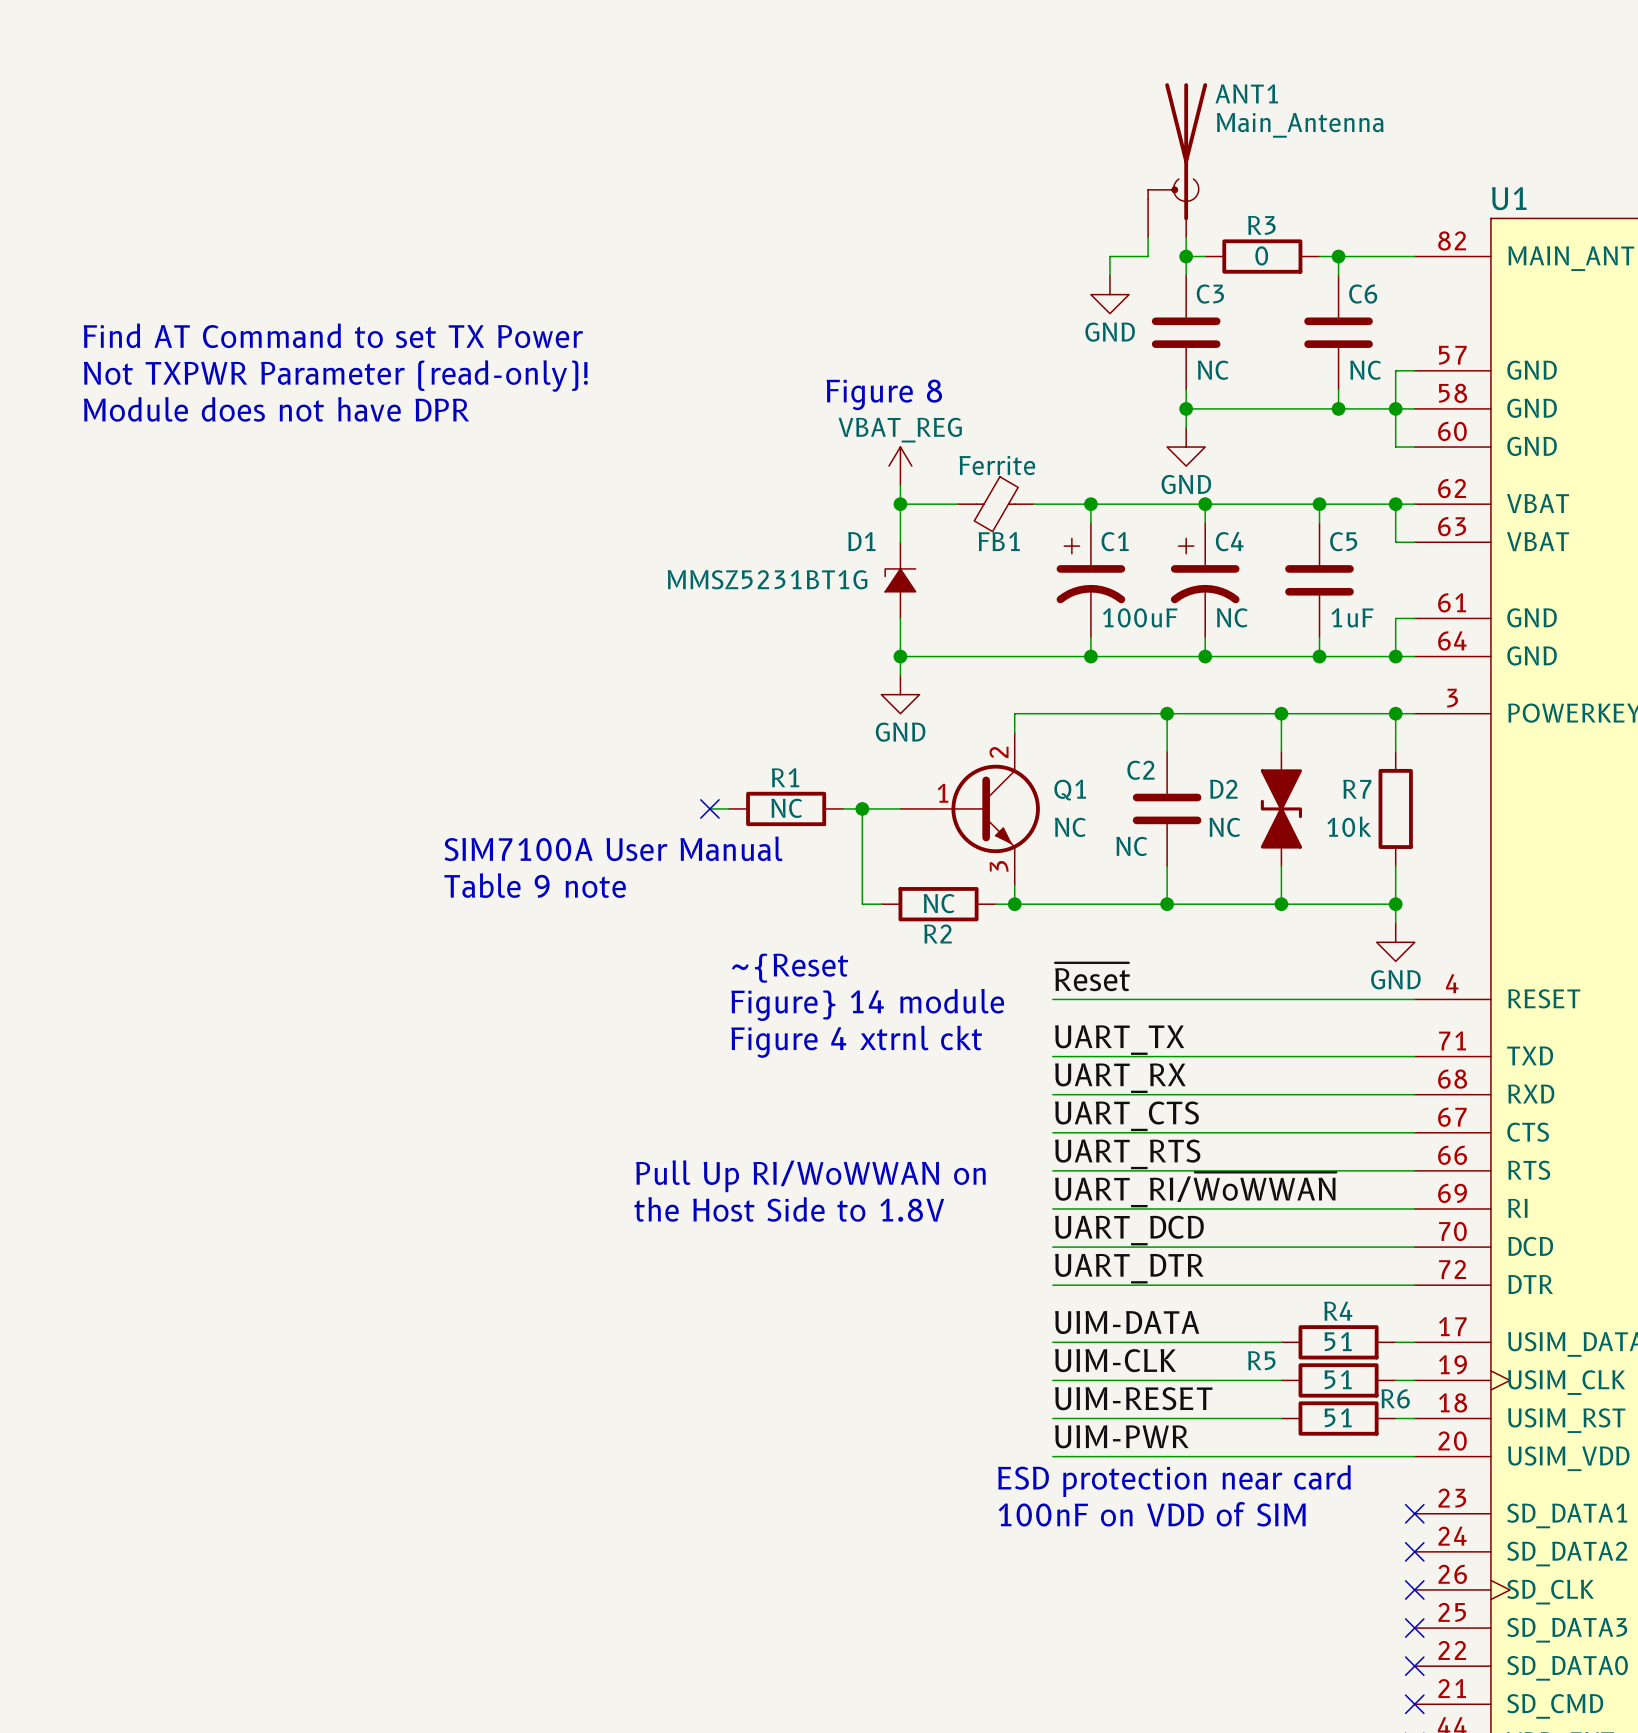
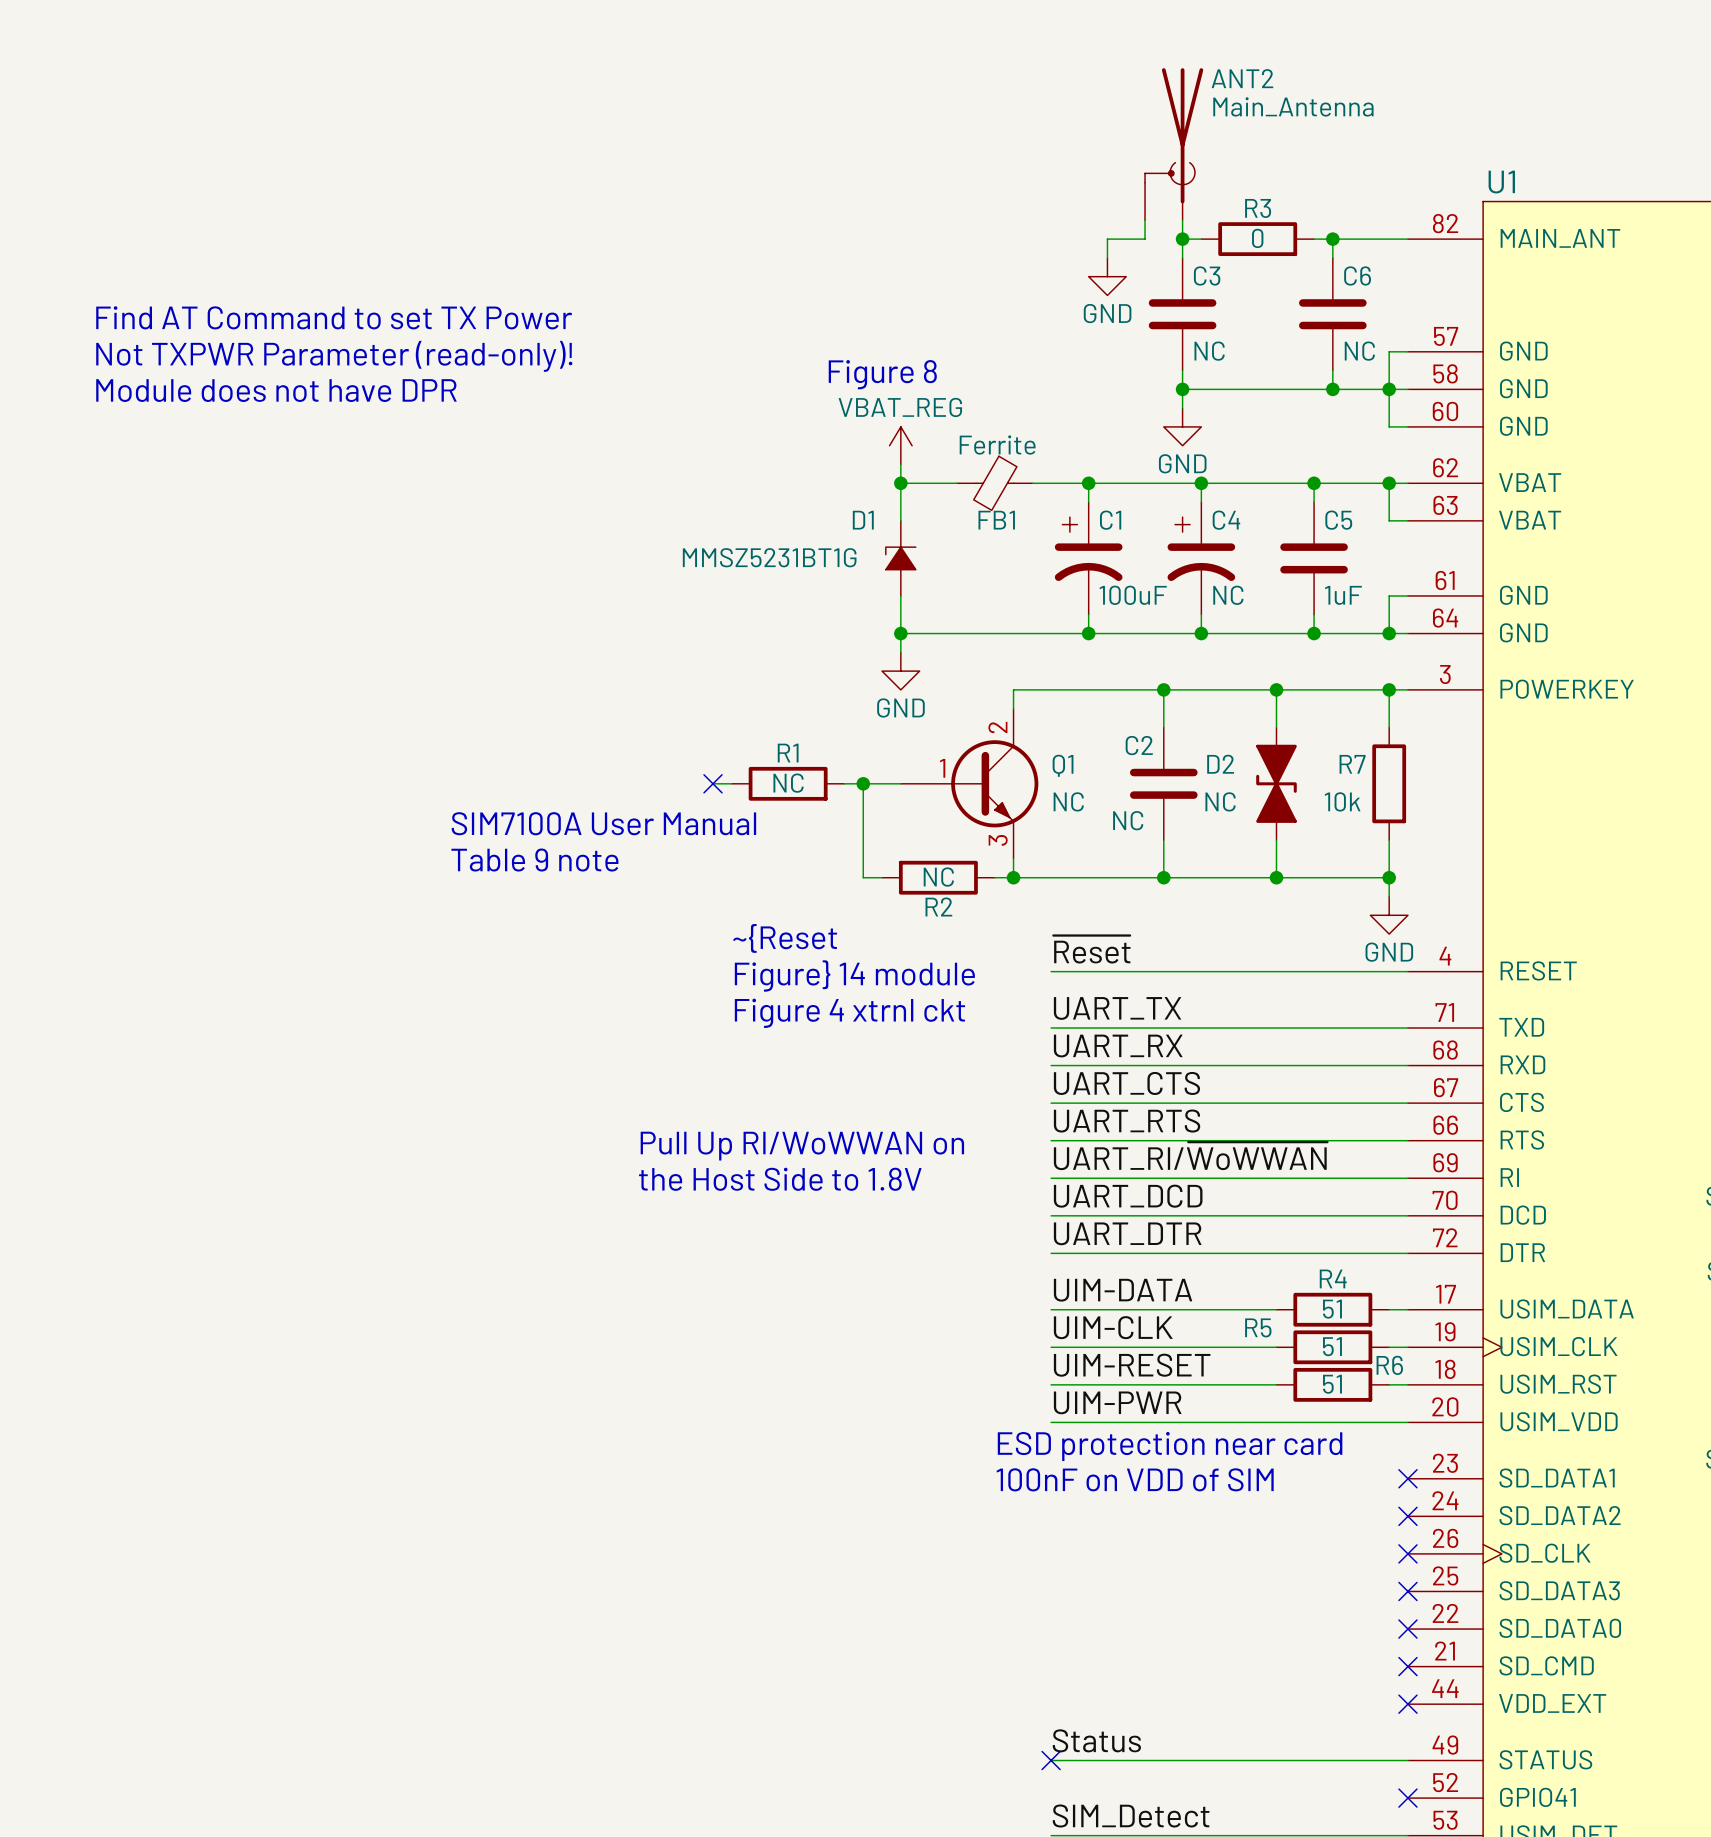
ANT1 name: ANT1 (1246, 93) -> ANT2 (1242, 78)

